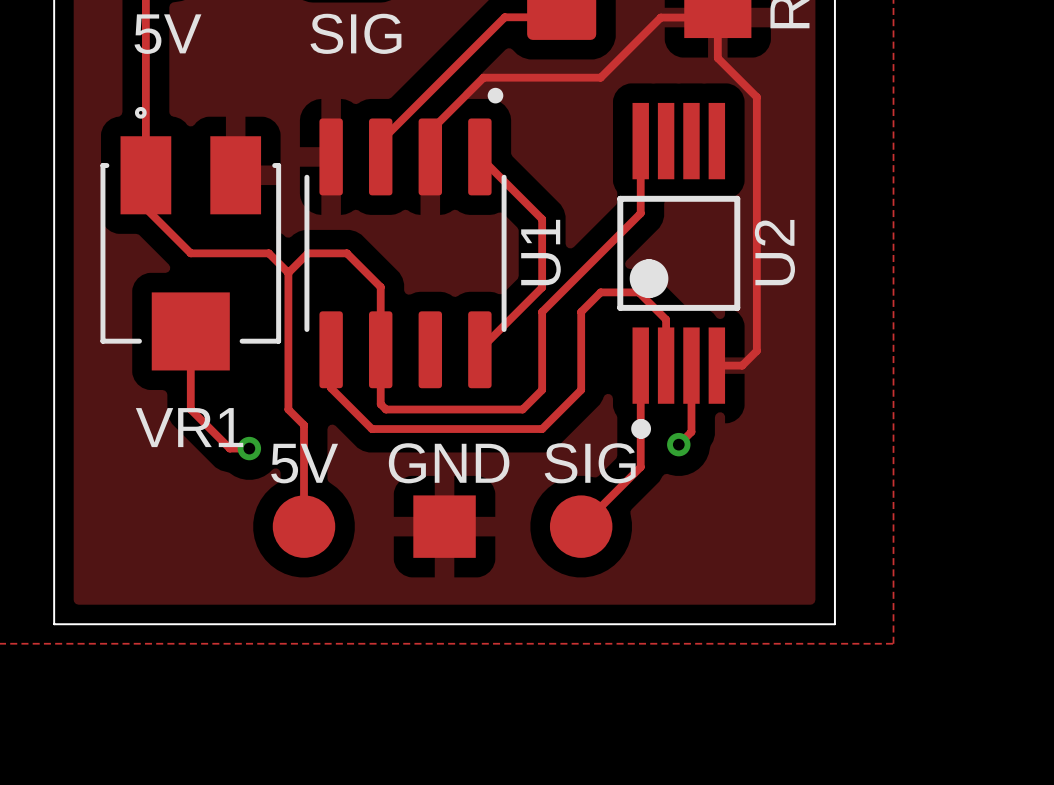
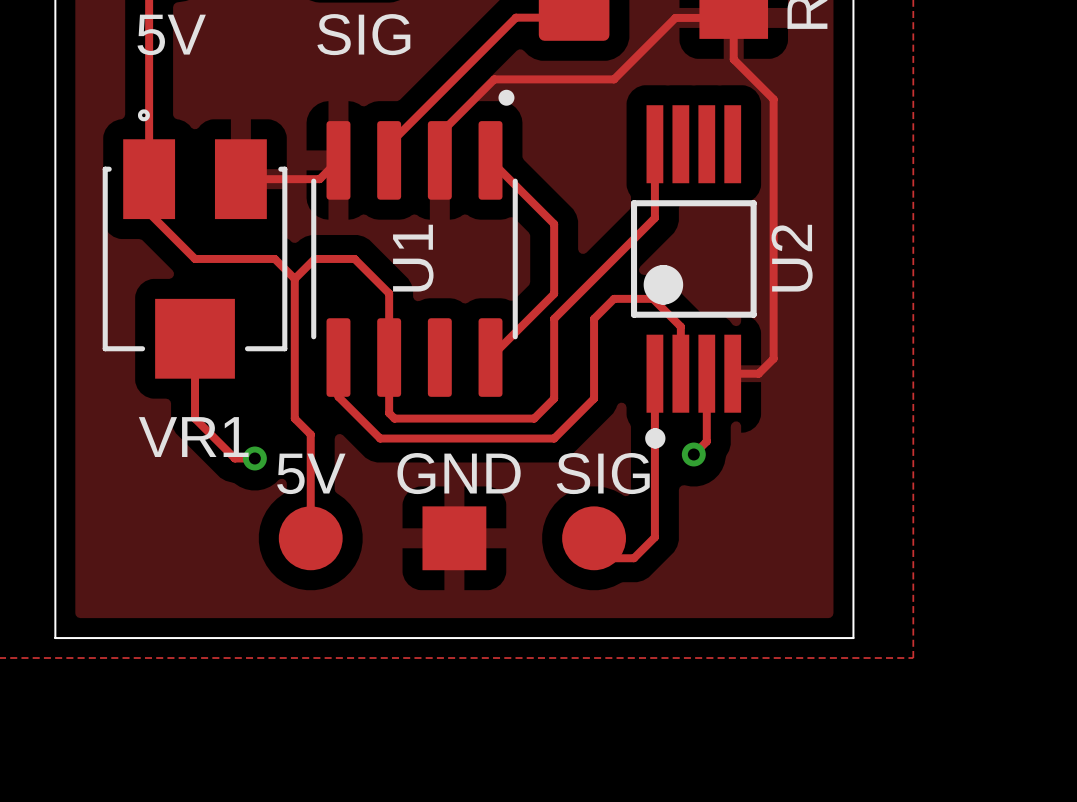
track: none -> (338, 160) (319, 179) (240, 179)
U1 name position: U1 (540, 252) -> U1 (413, 258)
track: (640, 467) (581, 526) -> (654, 477) (654, 537) (633, 558) (594, 558)

